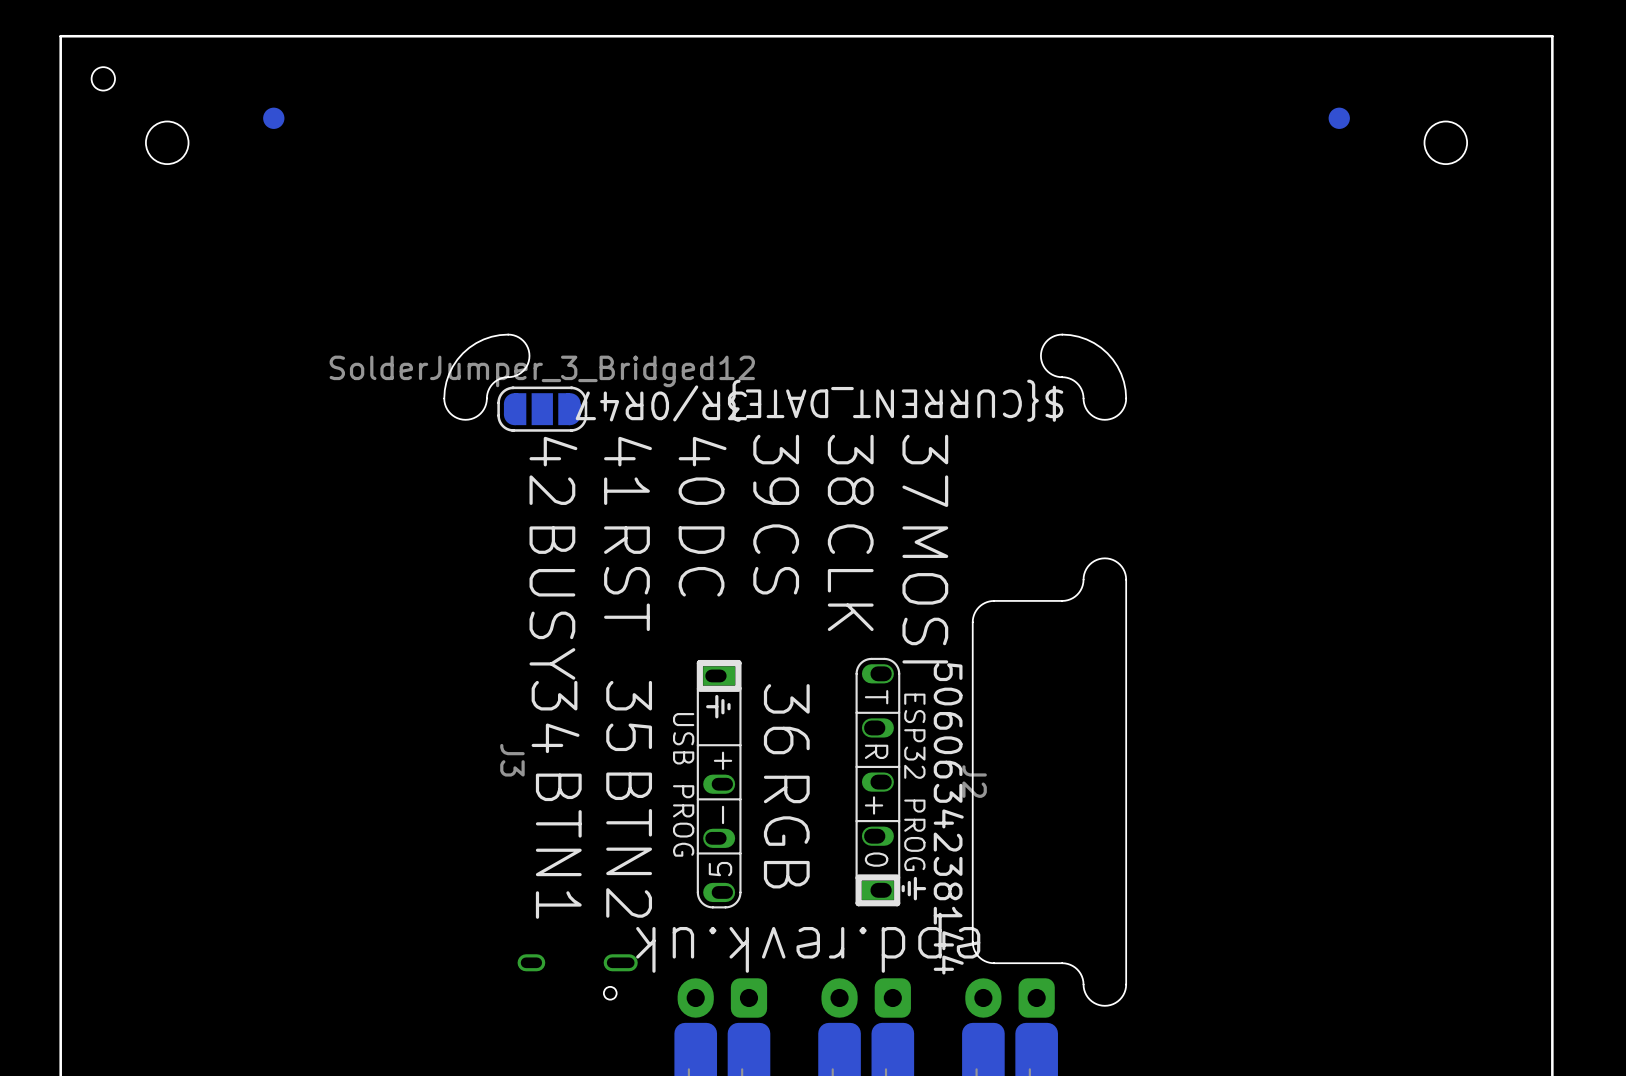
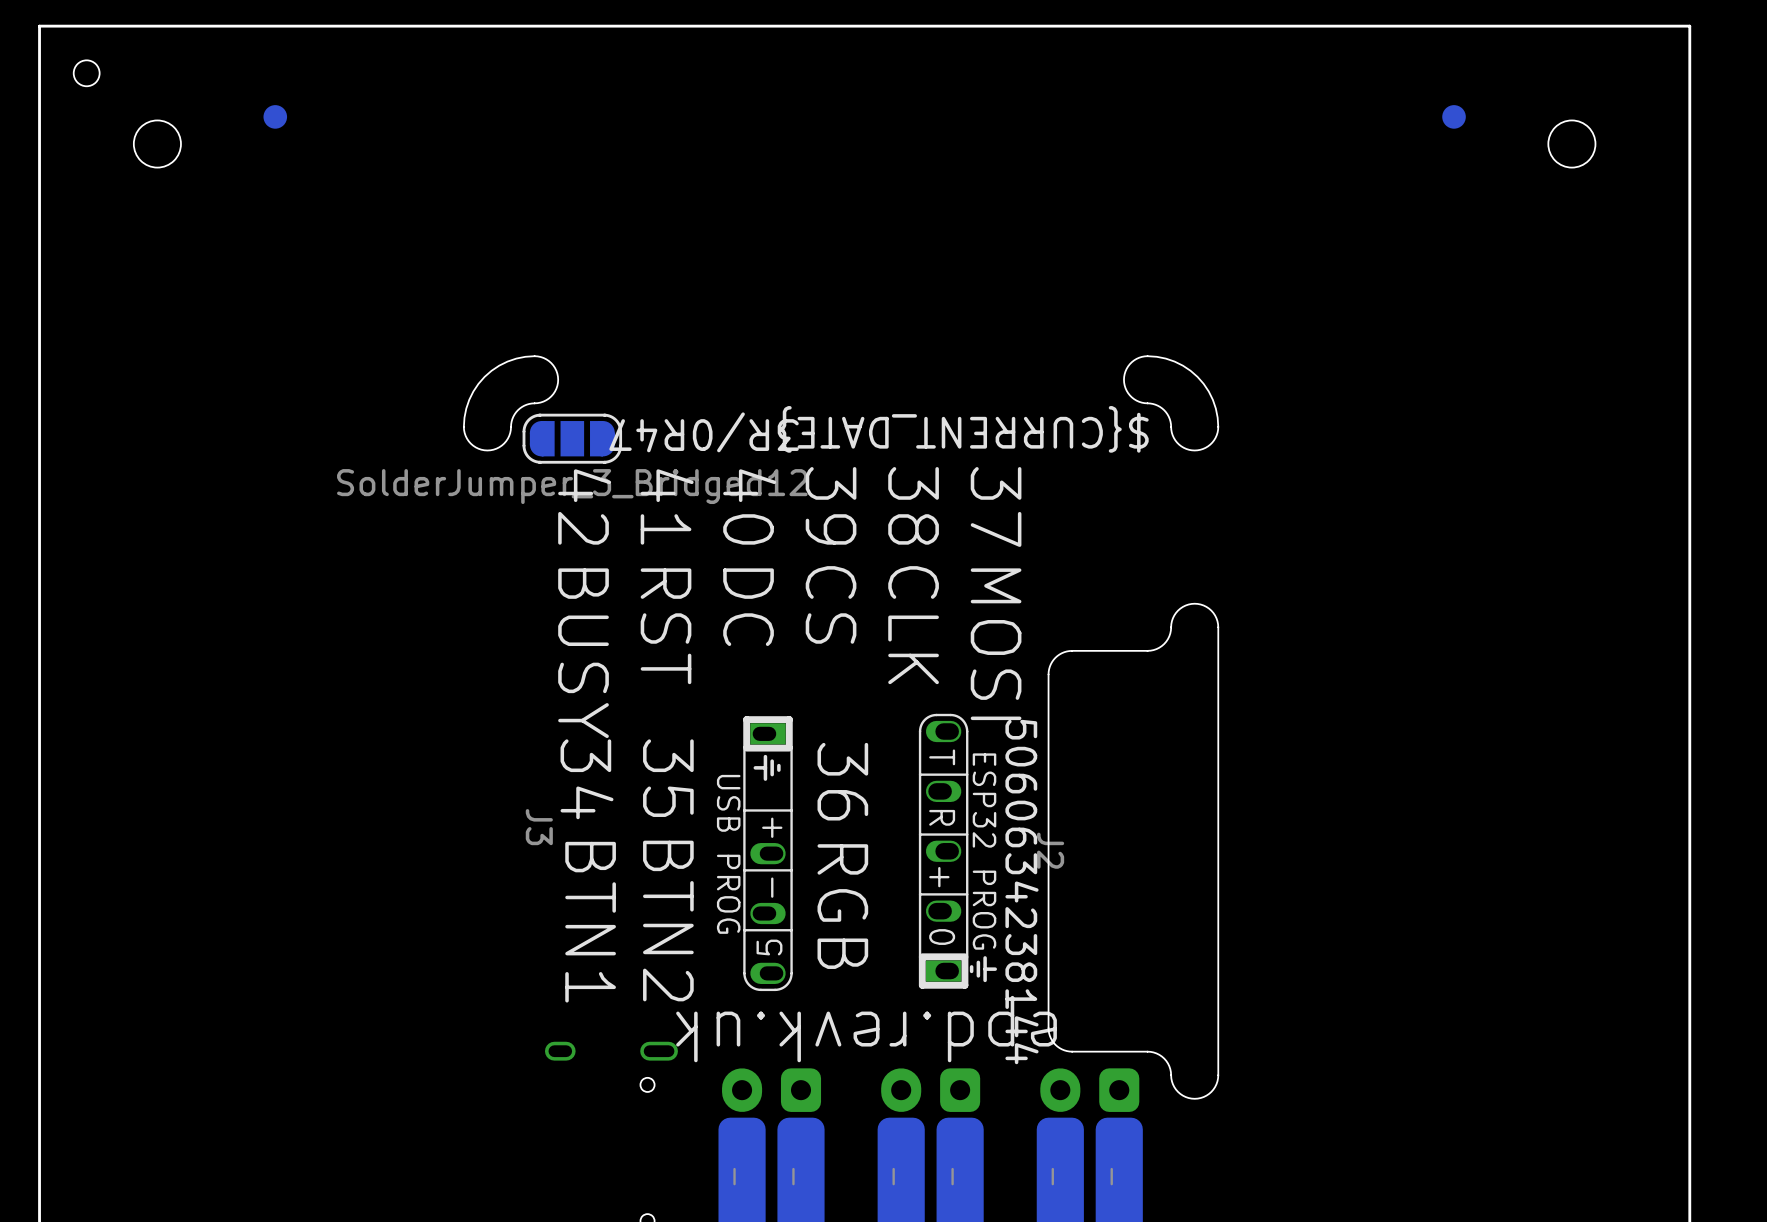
part value position: SolderJumper_3_Bridged12 (542, 371) -> SolderJumper_3_Bridged12 (572, 486)

